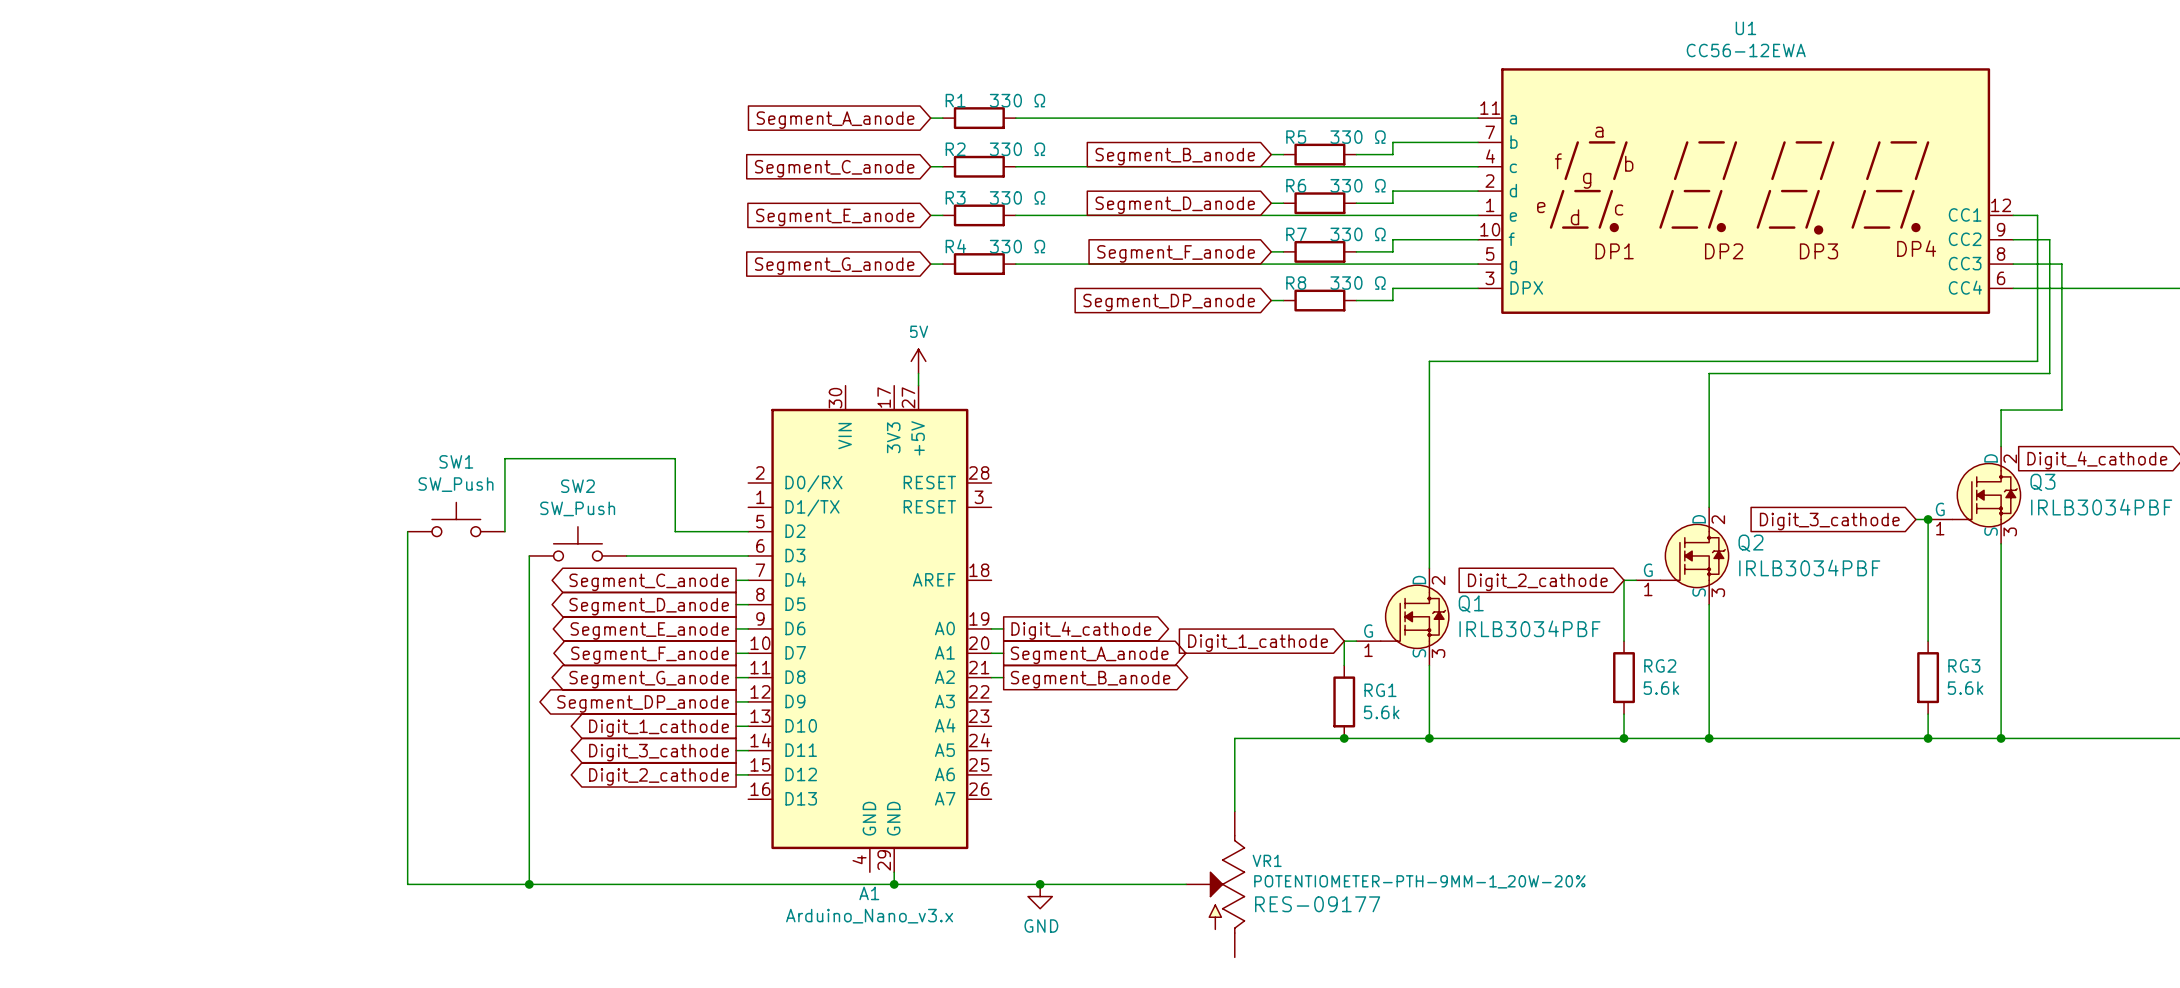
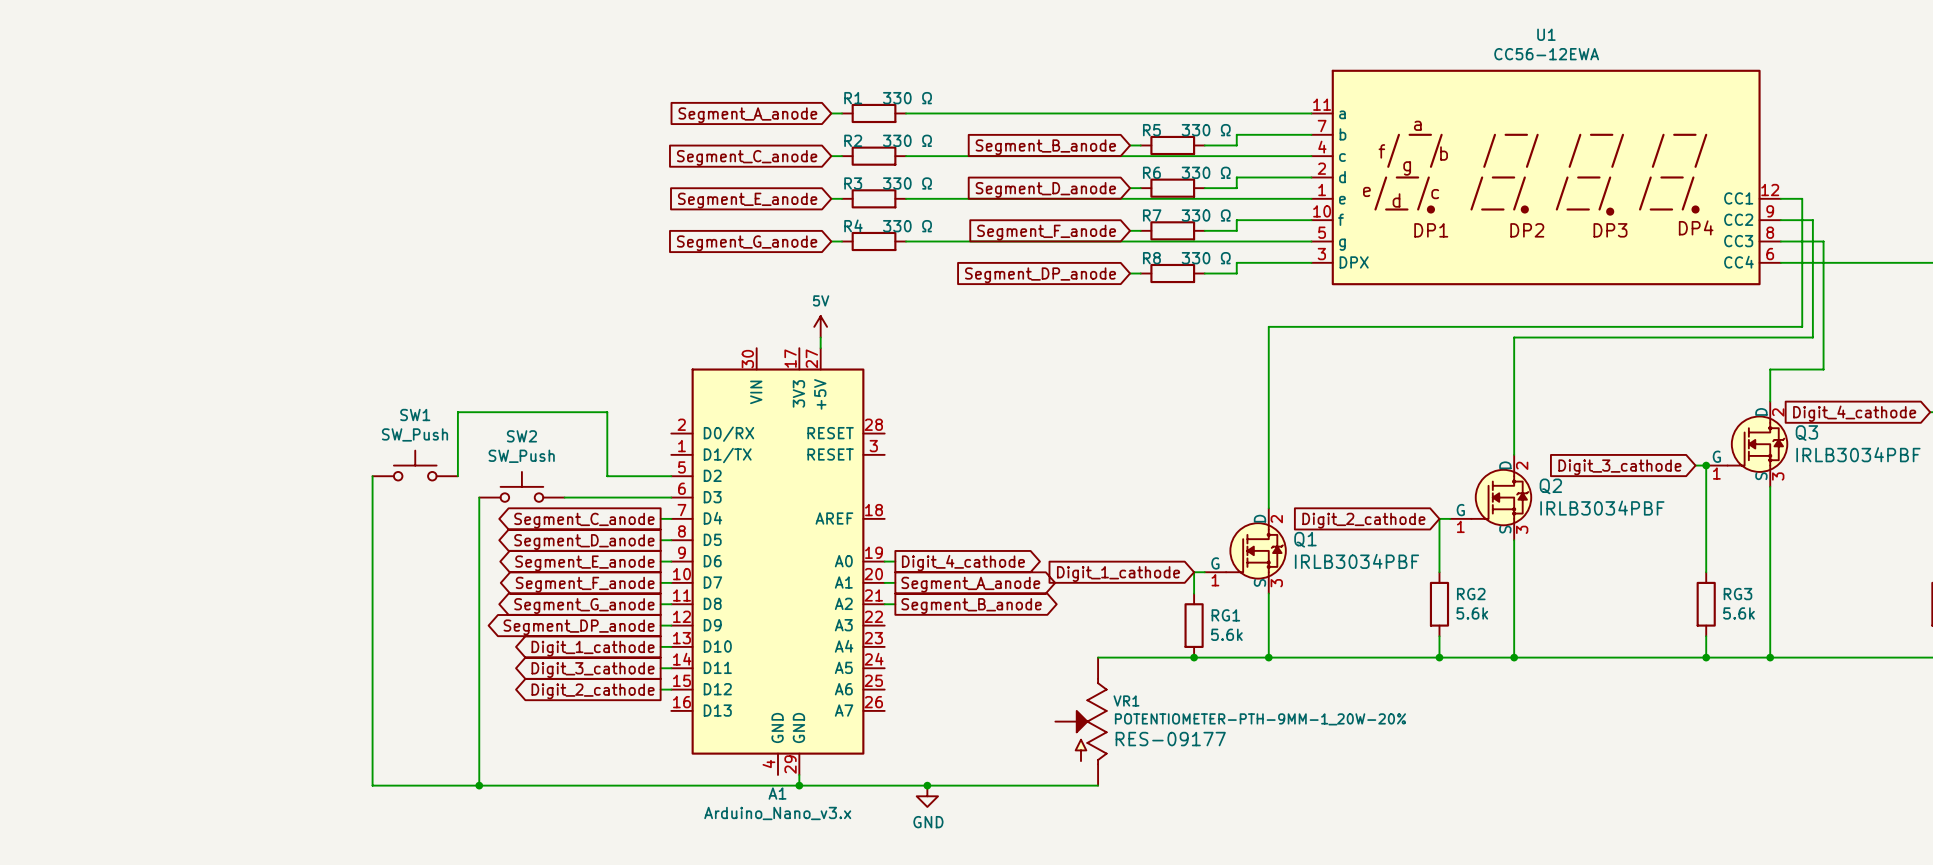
wire: (1234, 738) (1234, 811) -> none
VR1 position: (1215, 884) -> (1081, 721)

